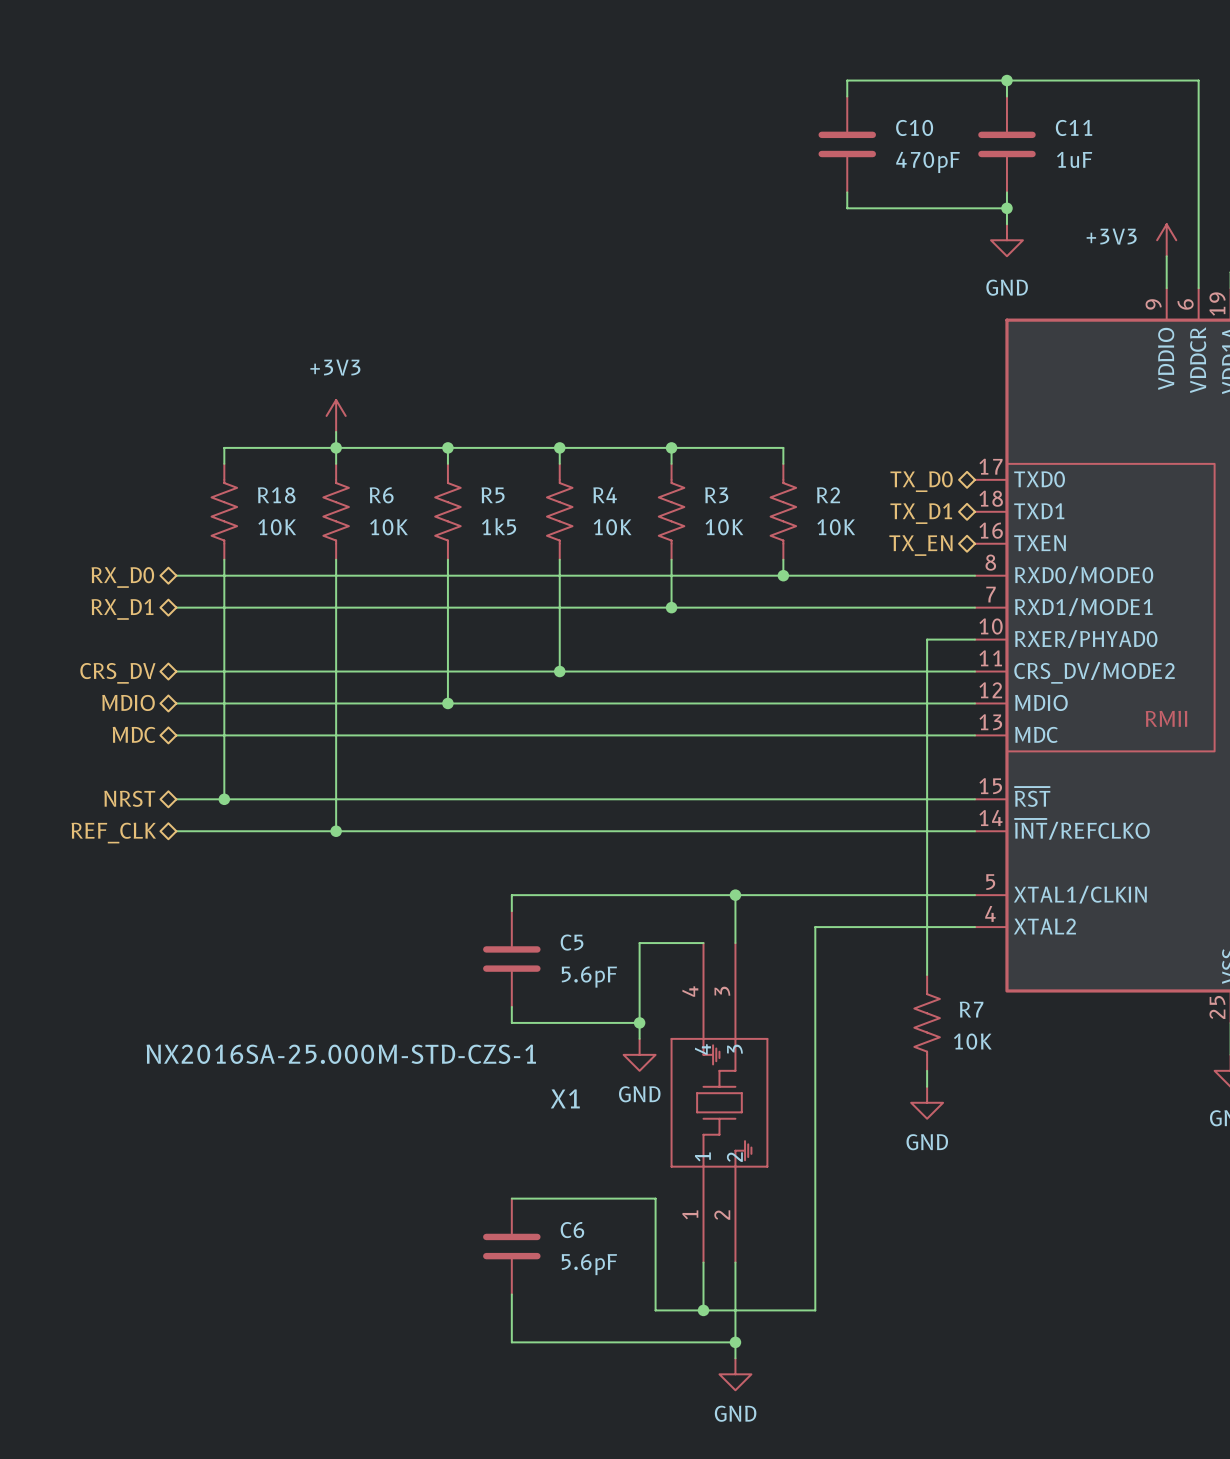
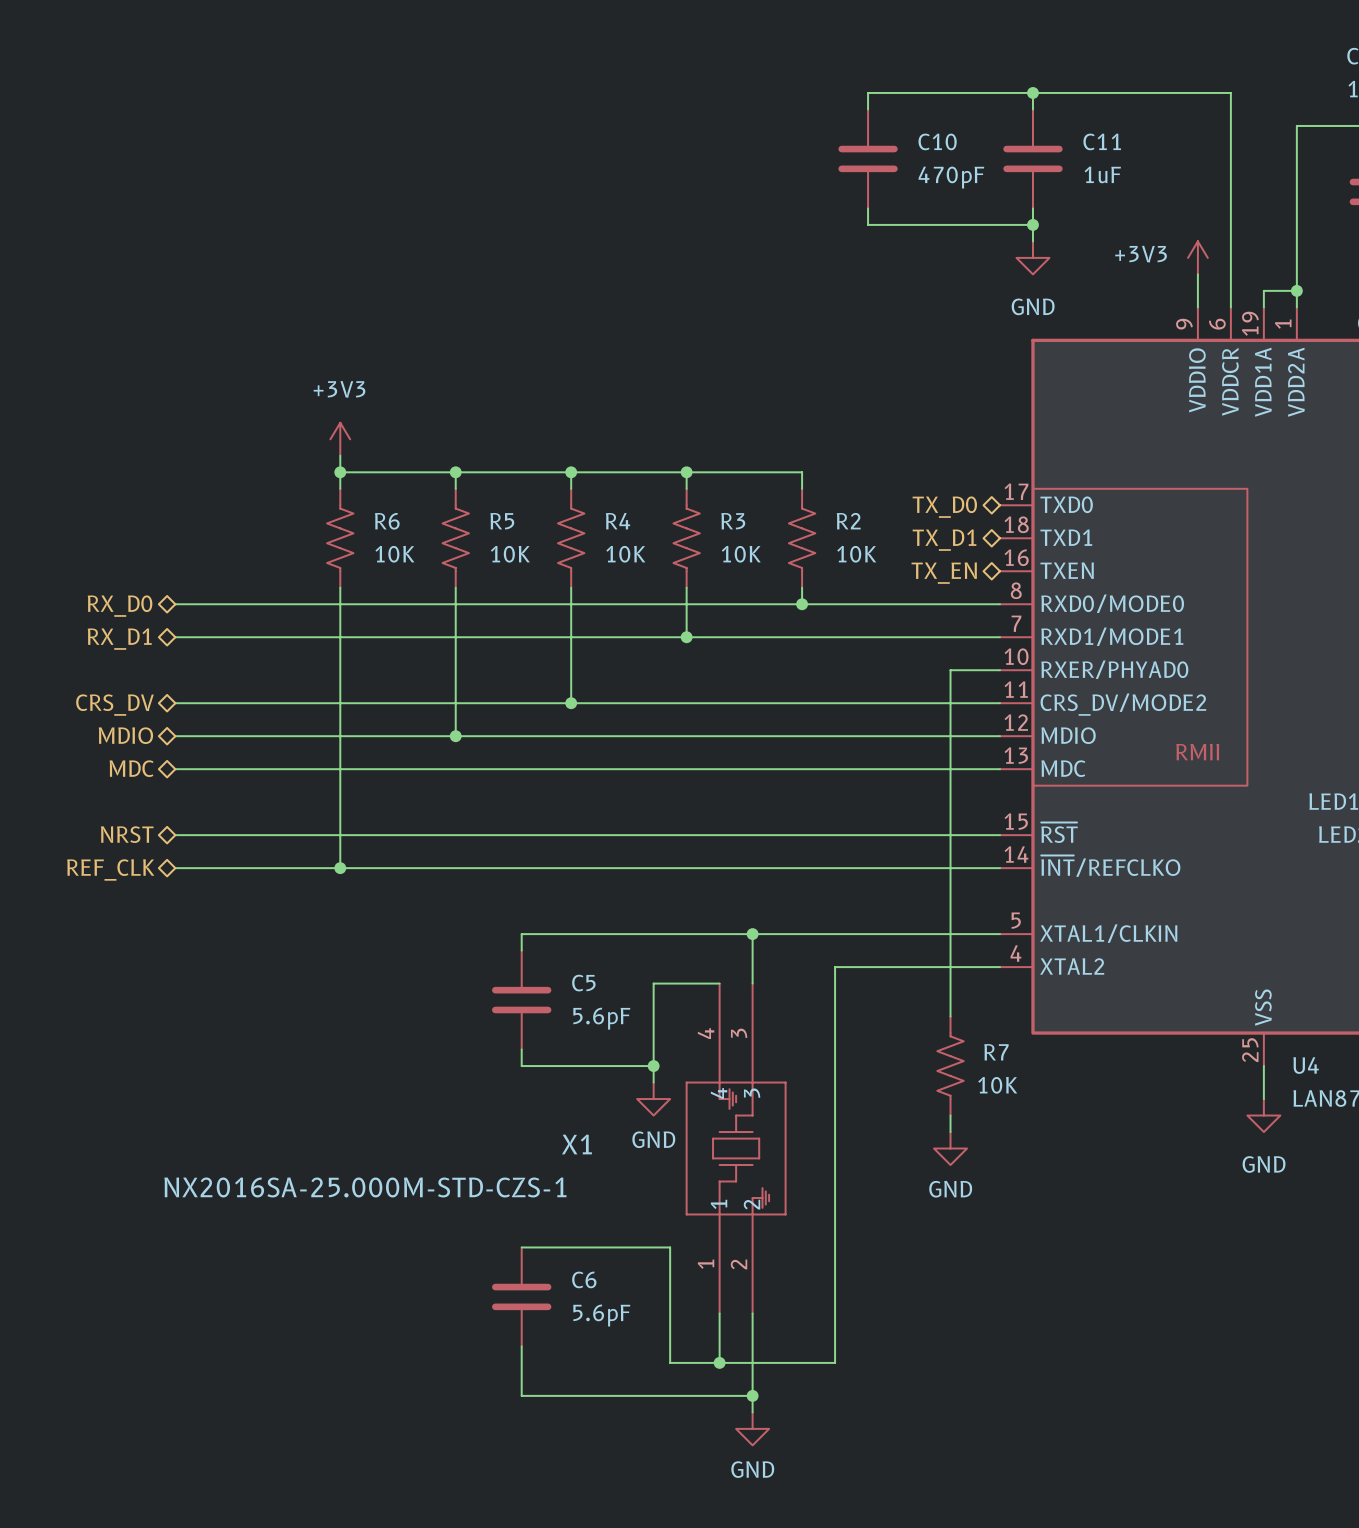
wire: (336, 447) (224, 447) (224, 463) -> none
R18: 10K (224, 511) -> none
R5 value: 1k5 (499, 526) -> 10K (510, 554)
wire: (224, 559) (224, 799) -> none
junction: (224, 799) -> none
X1 value position: NX2016SA-25.000M-STD-CZS-1 (341, 1054) -> NX2016SA-25.000M-STD-CZS-1 (365, 1187)

